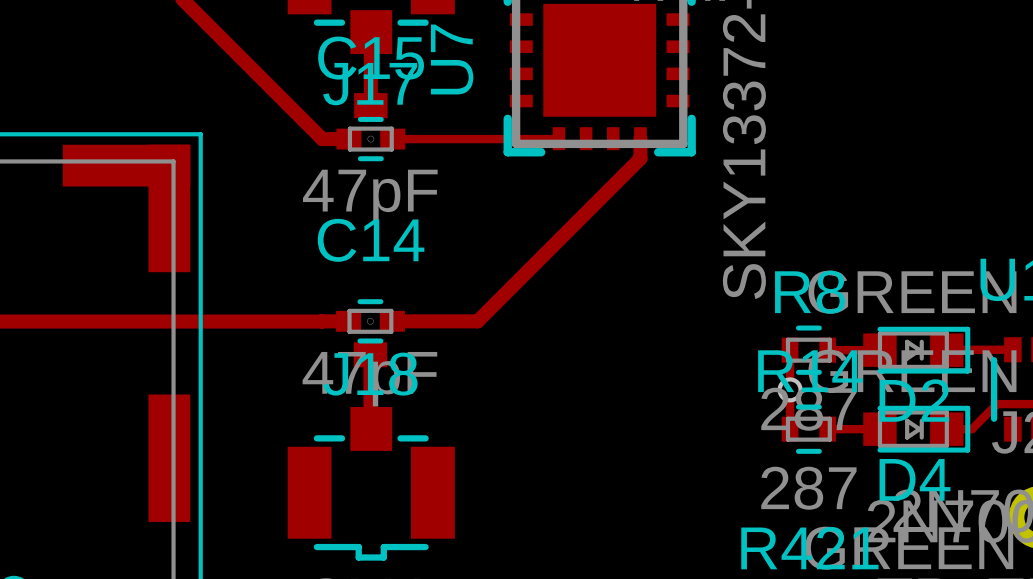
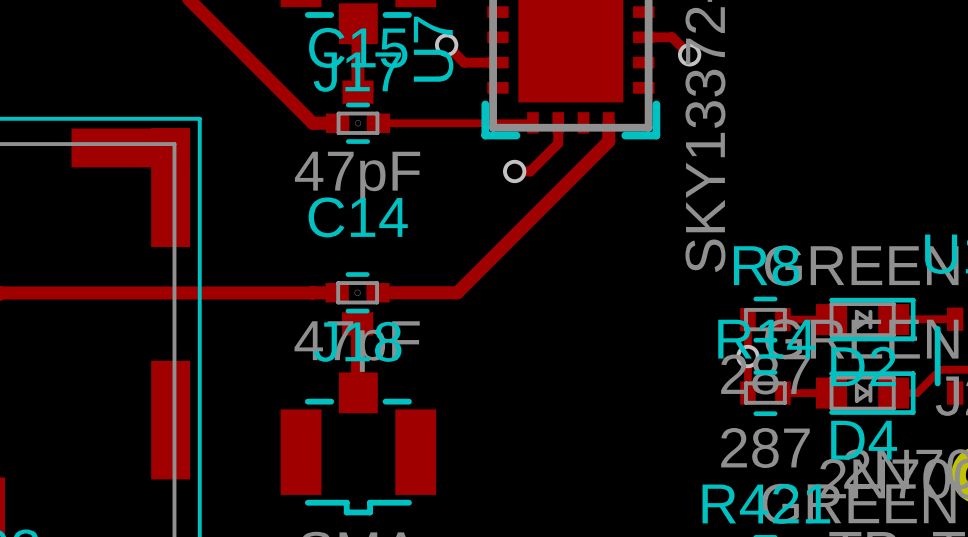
top track: none -> (643, 37) (672, 37) (689, 54)
top track: none -> (446, 45) (464, 62) (497, 62)
via: none -> (446, 45)
via: none -> (689, 54)
top track: none -> (558, 122) (558, 143) (530, 171) (514, 171)
via: none -> (514, 171)

